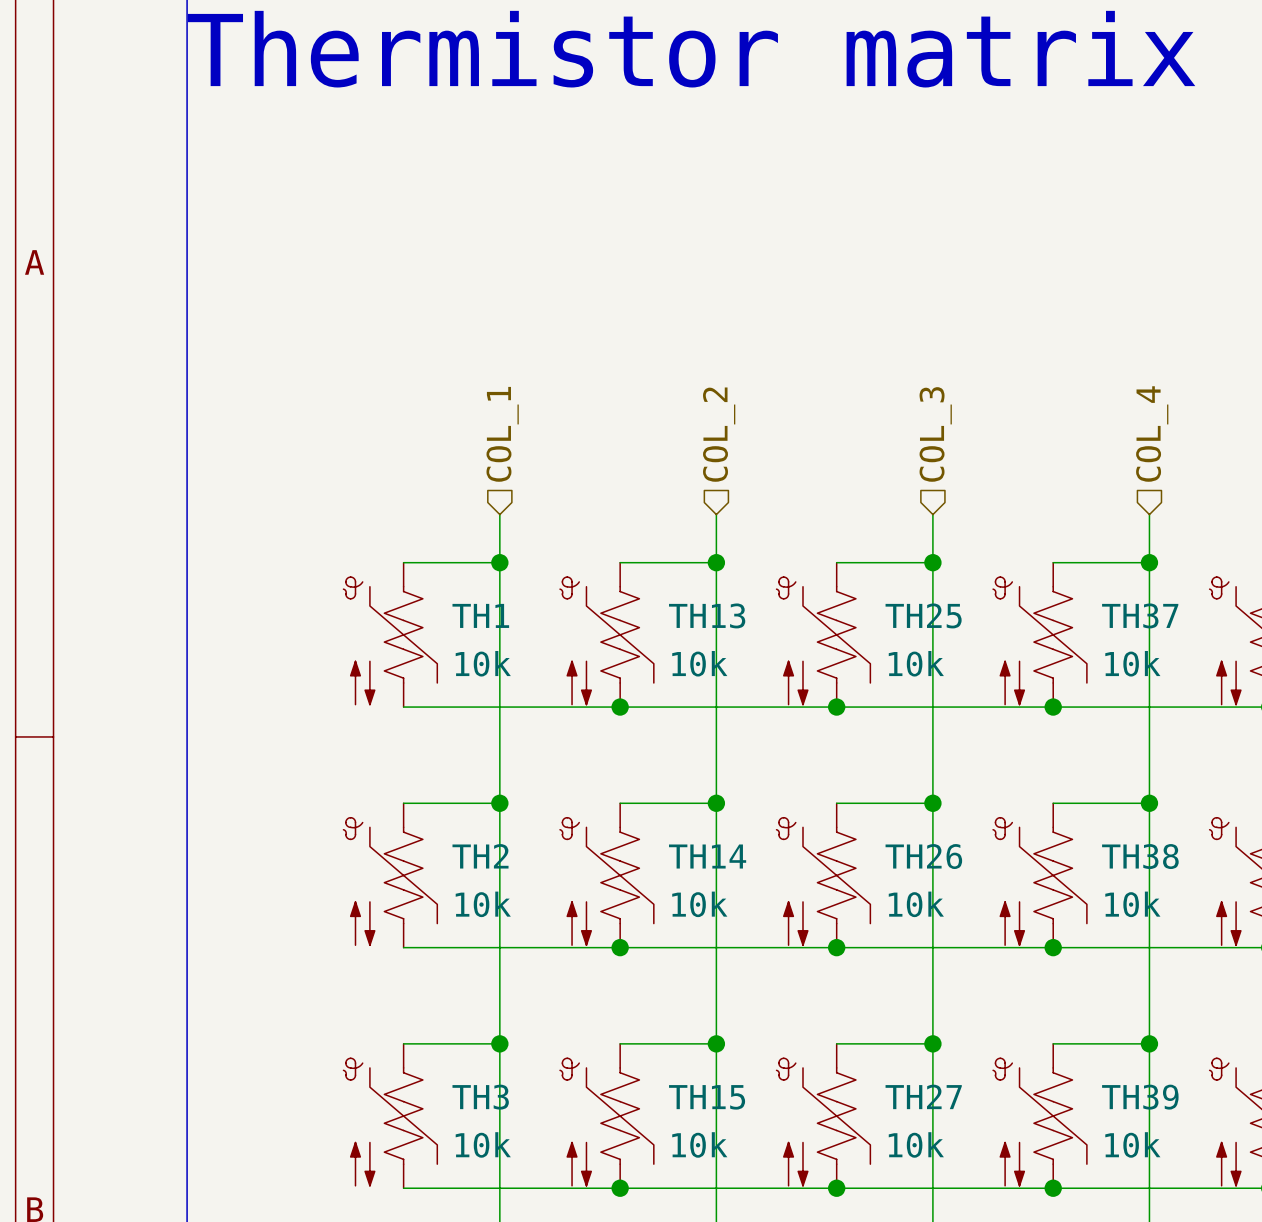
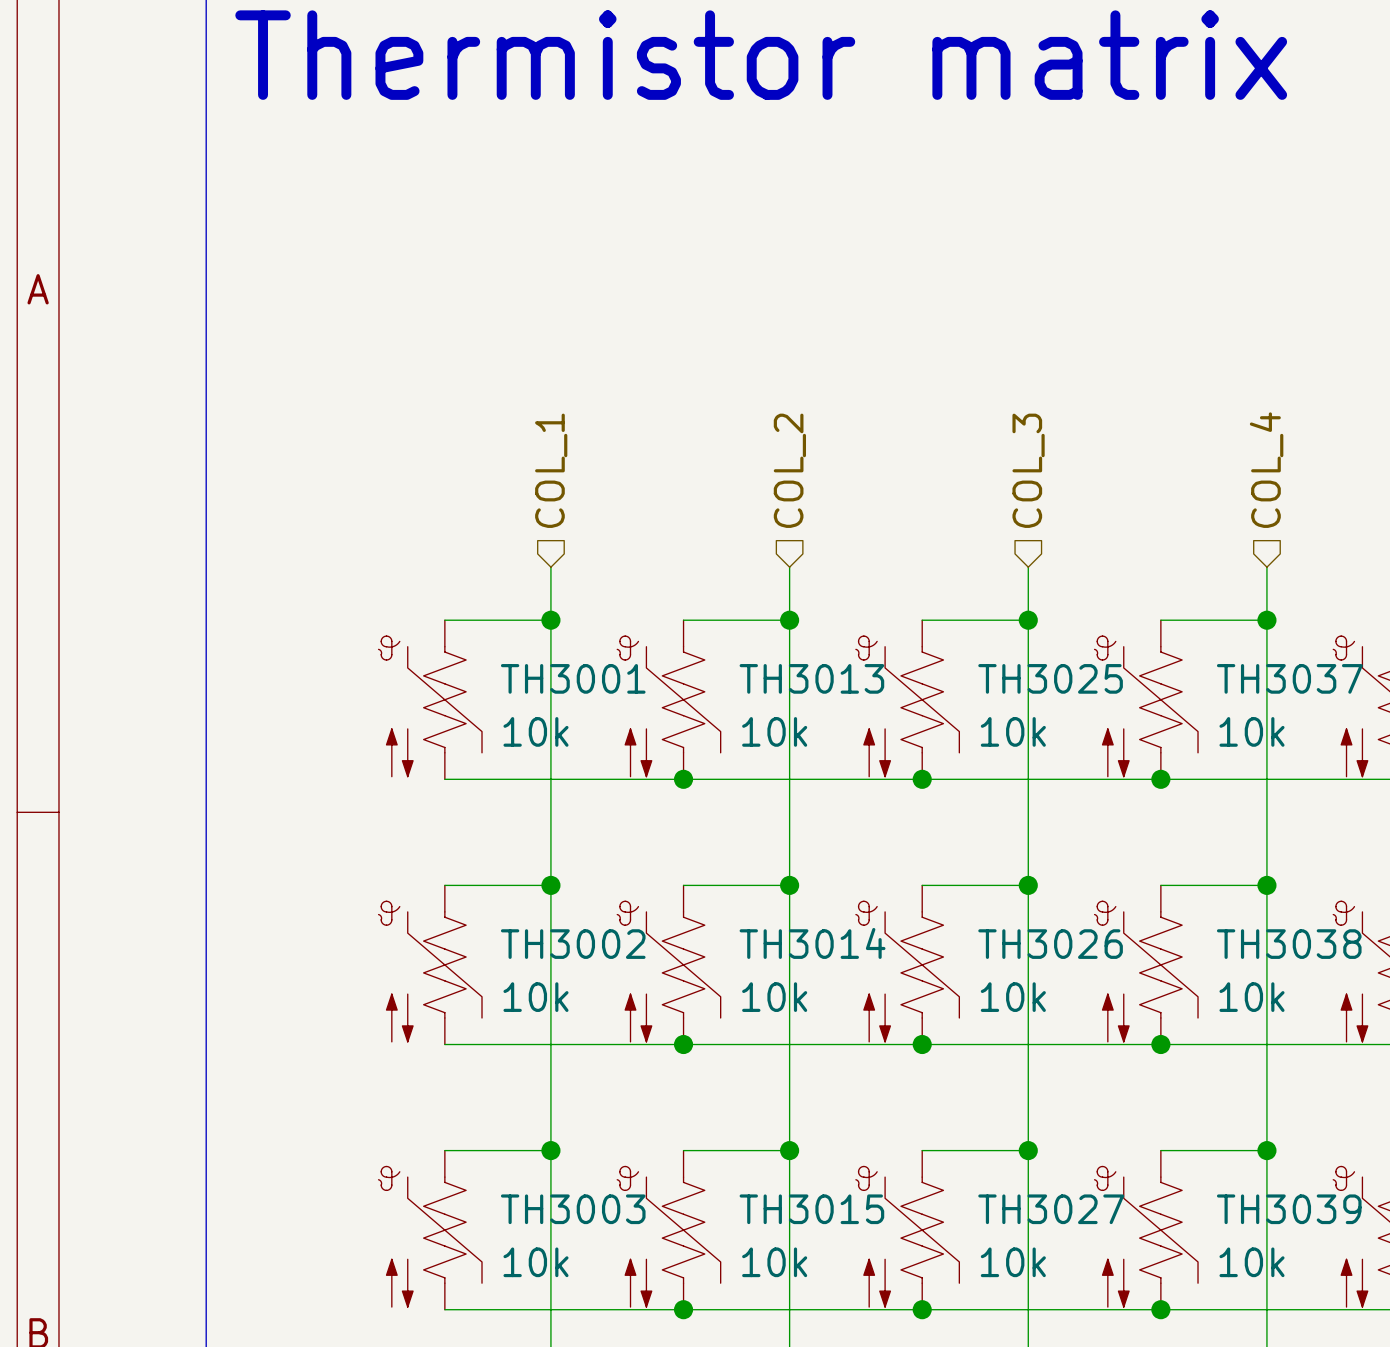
TH1 name: TH1 (480, 615) -> TH3001 (573, 678)
TH13 name: TH13 (707, 615) -> TH3013 (811, 678)
TH25 name: TH25 (923, 615) -> TH3025 (1050, 678)
TH37 name: TH37 (1140, 615) -> TH3037 (1289, 678)
TH2 name: TH2 (480, 856) -> TH3002 (573, 944)
TH14 name: TH14 (707, 856) -> TH3014 (812, 943)
TH26 name: TH26 (923, 856) -> TH3026 (1050, 944)
TH38 name: TH38 (1140, 856) -> TH3038 (1289, 944)
TH27 name: TH27 (923, 1096) -> TH3027 (1051, 1209)
TH3 name: TH3 (480, 1097) -> TH3003 (573, 1209)
TH15 name: TH15 (707, 1097) -> TH3015 (811, 1209)
TH39 name: TH39 (1140, 1097) -> TH3039 (1289, 1209)

